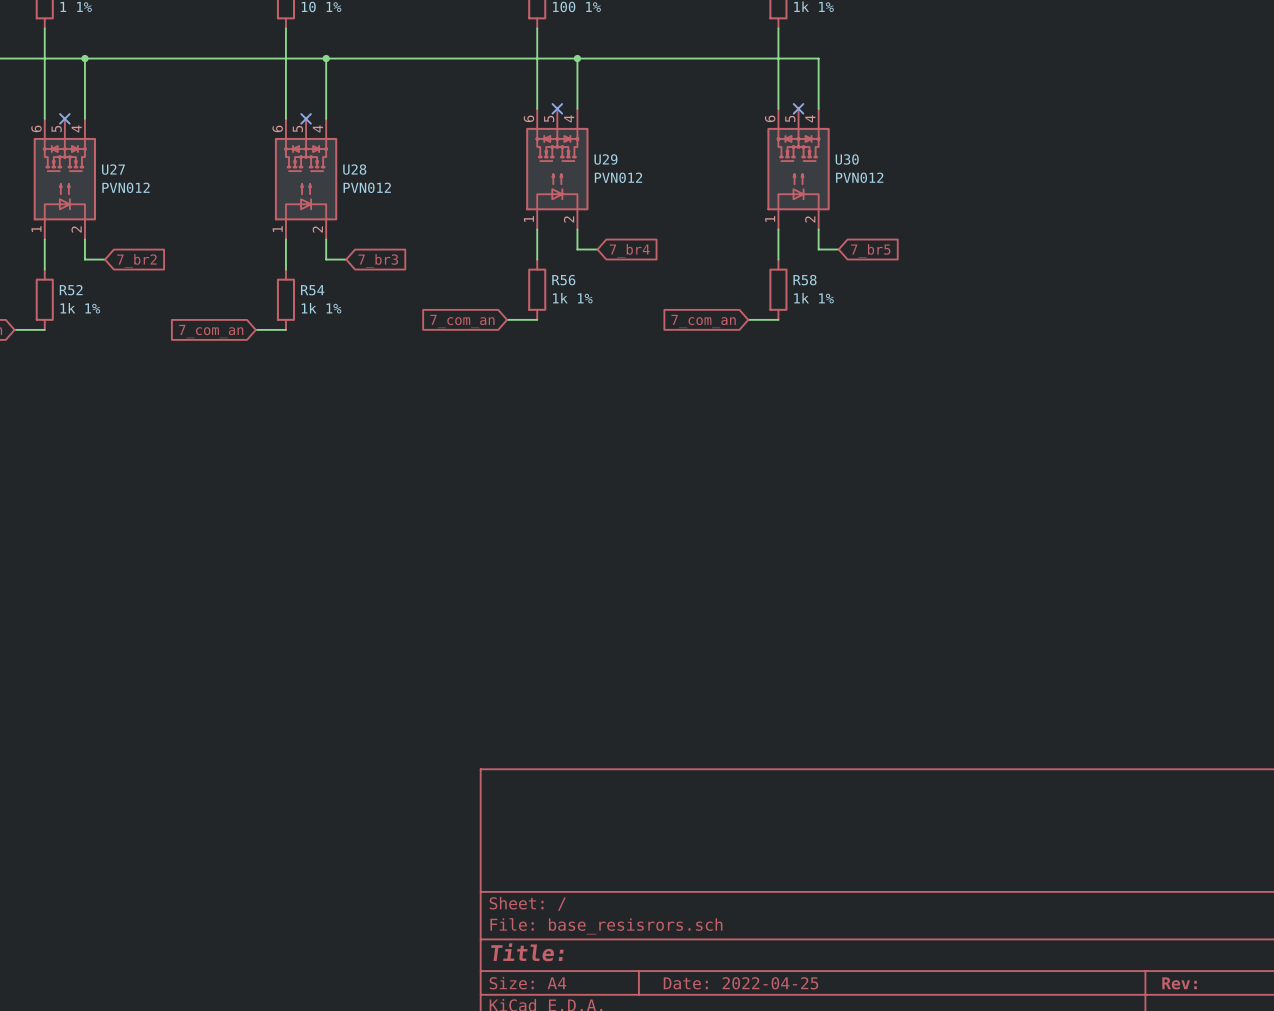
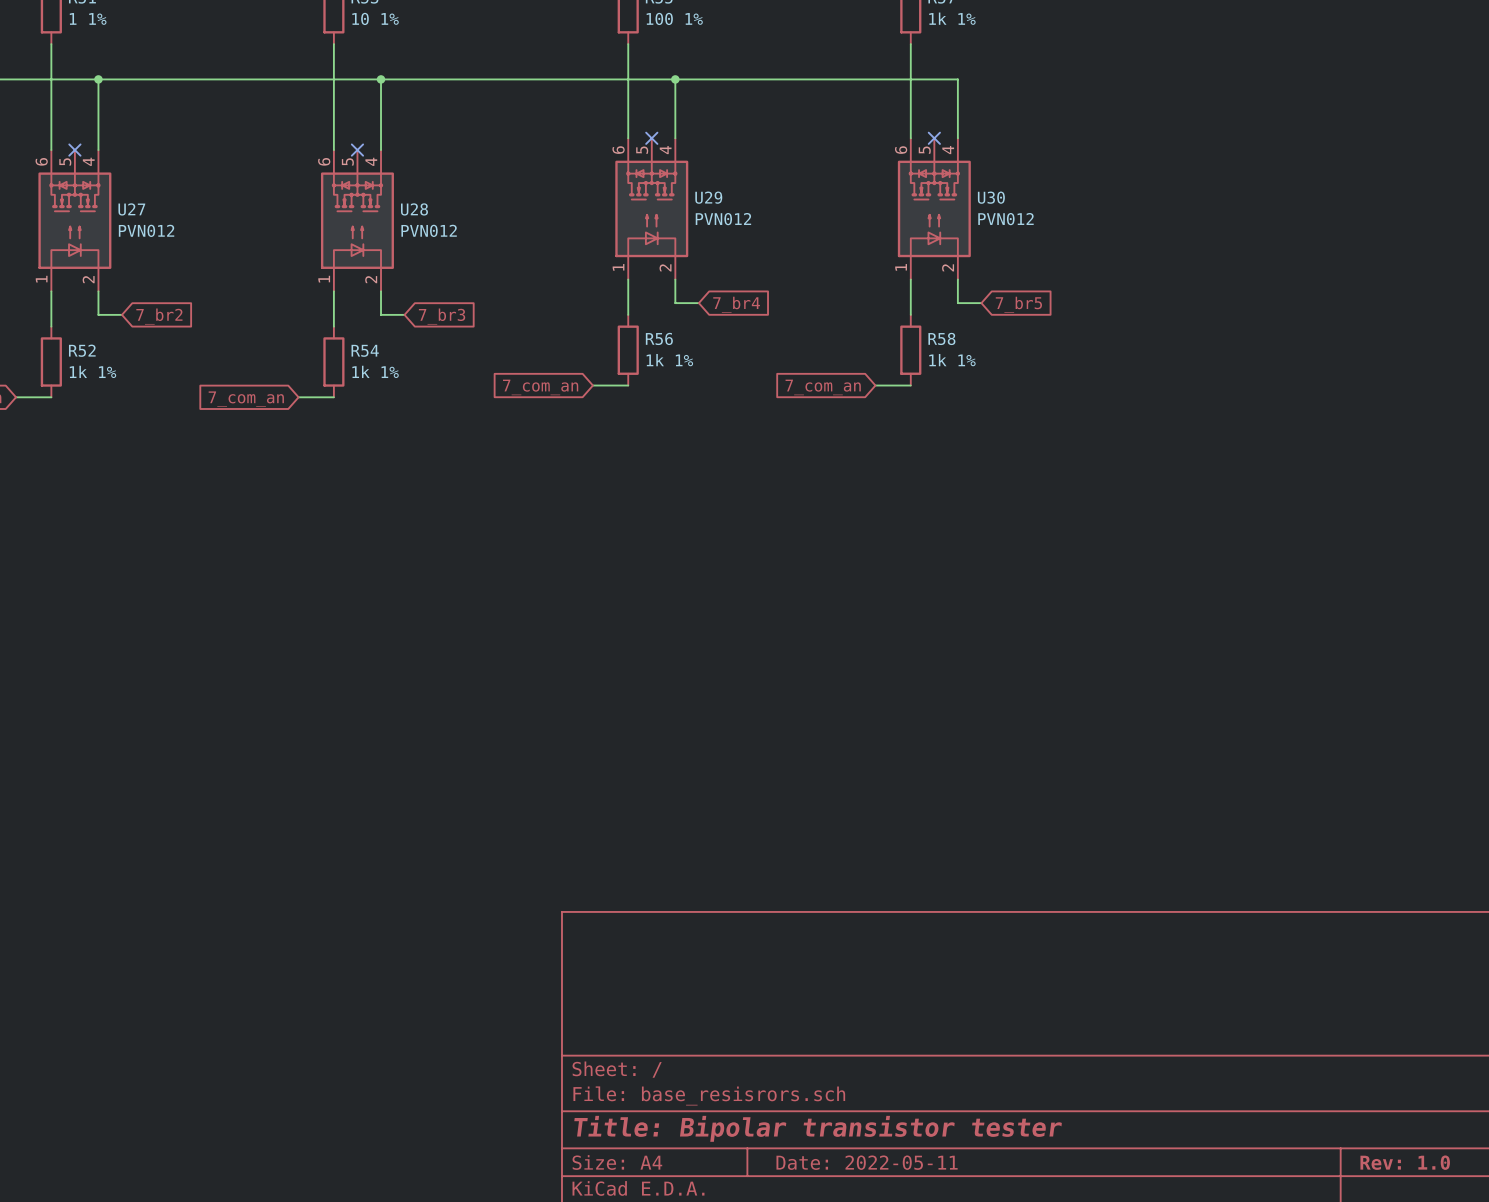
title block: Title: (527, 952) -> Title: Bipolar transistor tester (818, 1128)
title block: Date: 2022-04-25 (740, 983) -> Date: 2022-05-11 (867, 1162)
title block: Rev: (1179, 983) -> Rev: 1.0 (1405, 1162)

